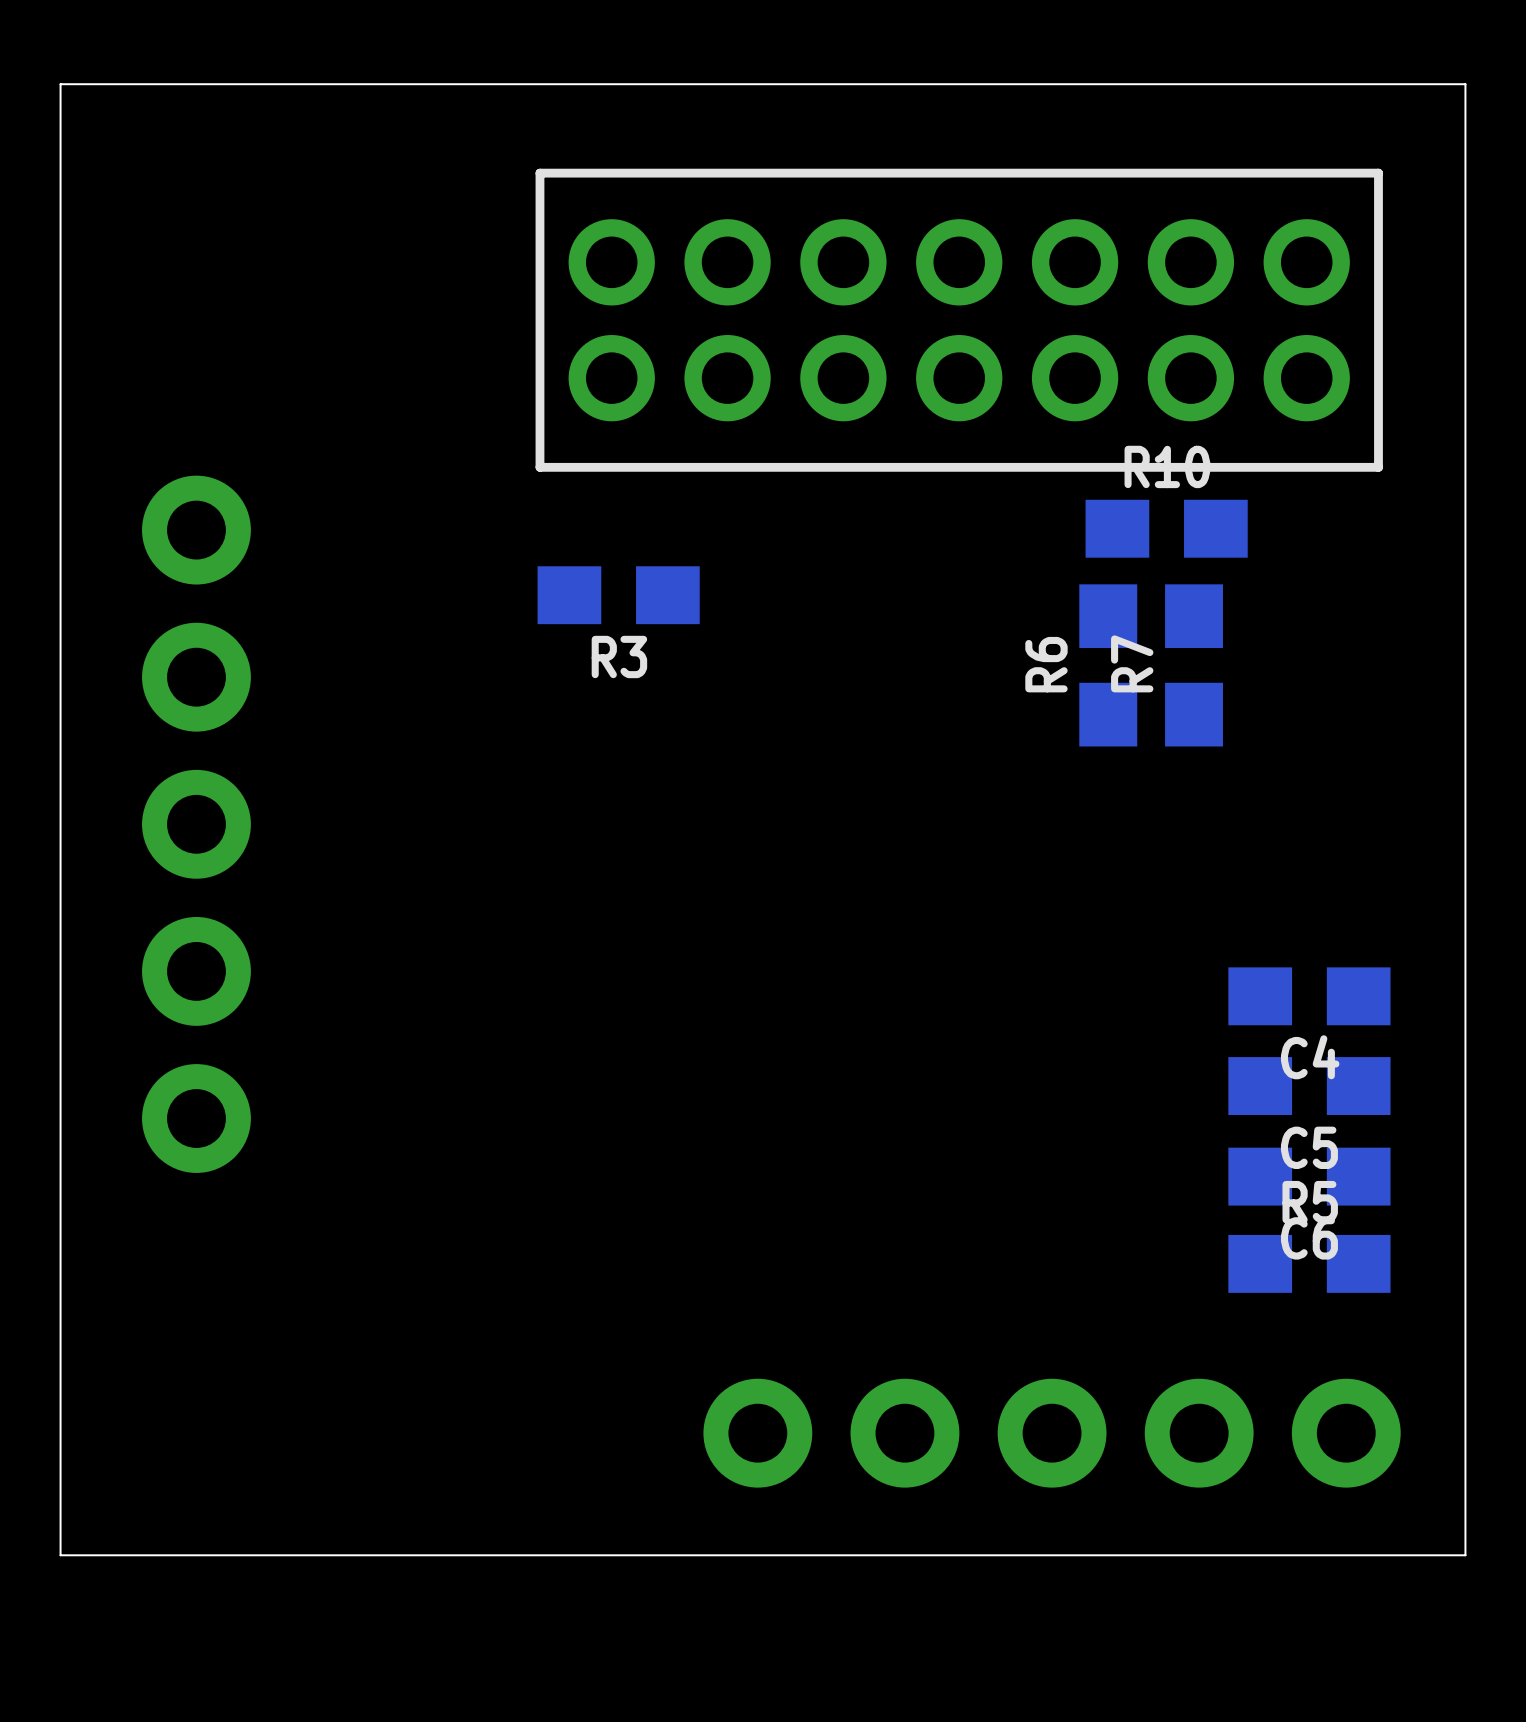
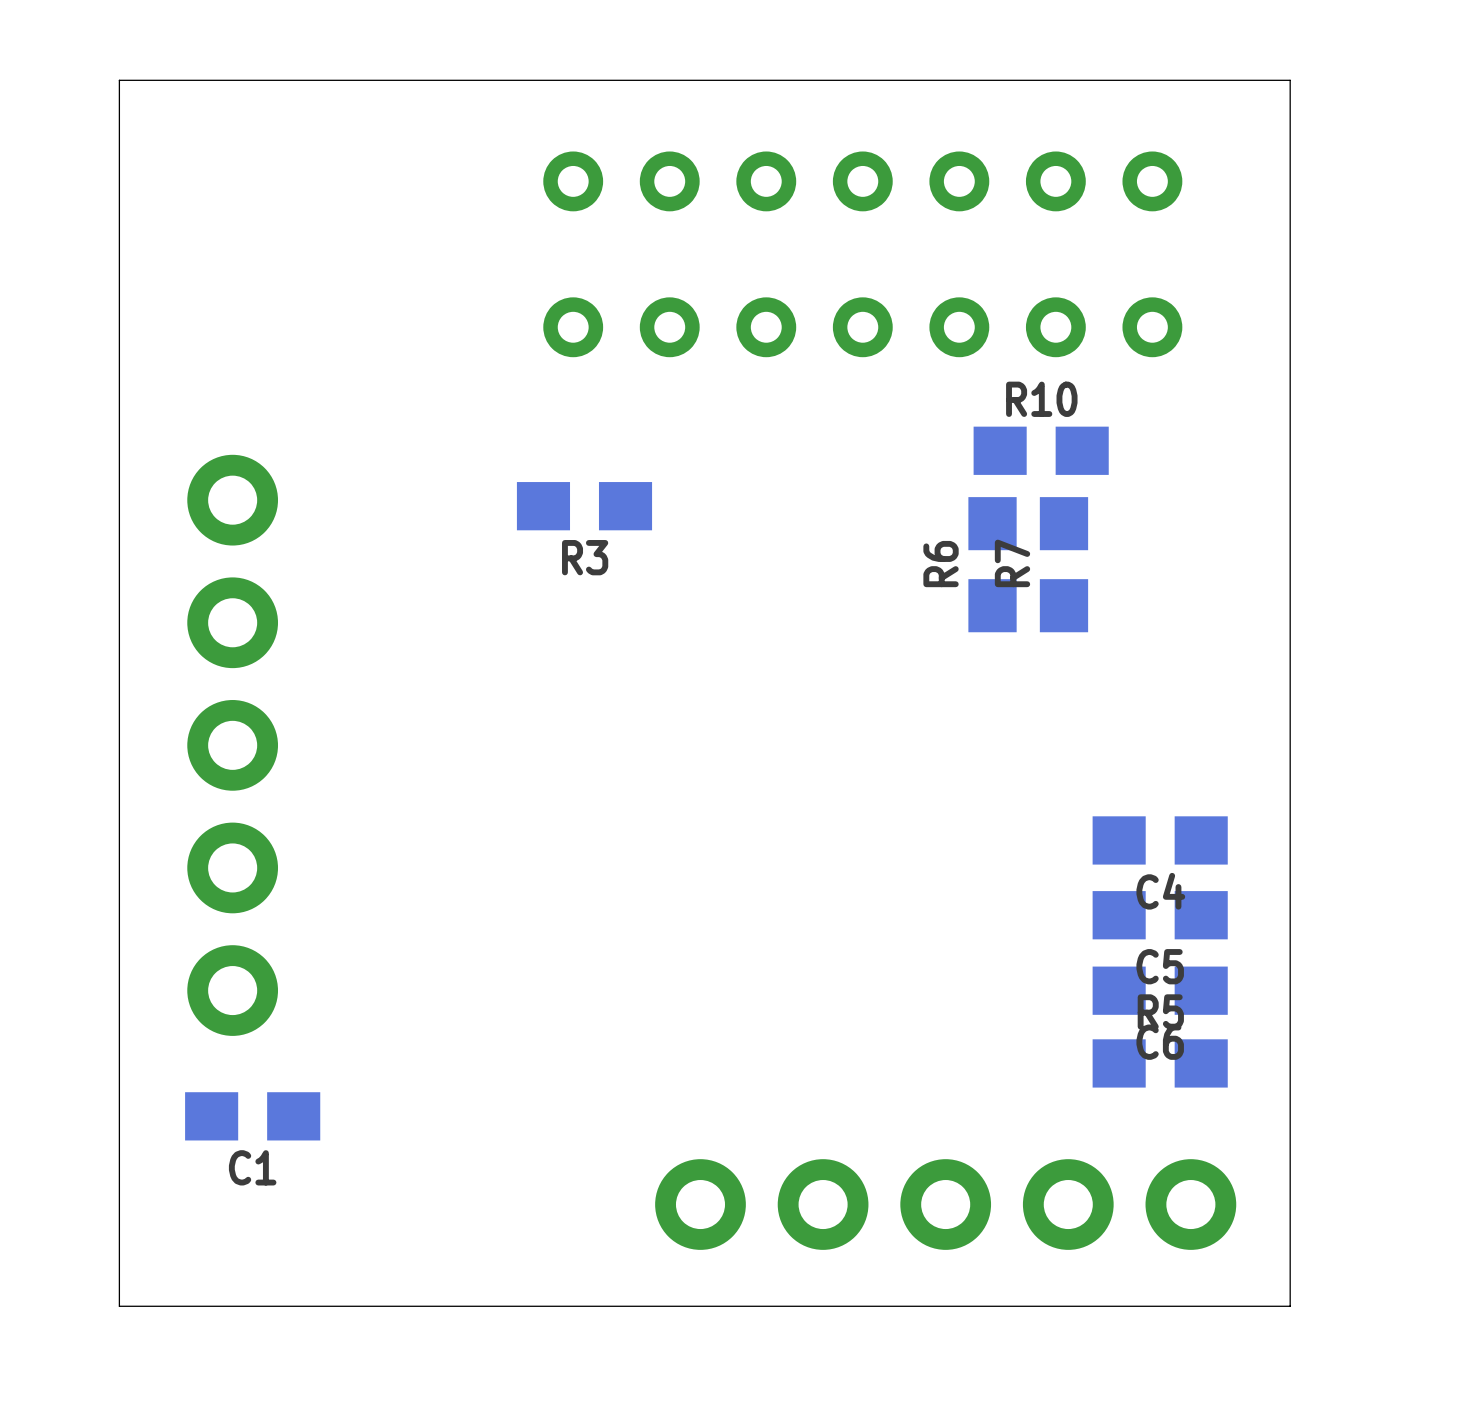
part footprint: [535, 168, 1383, 472] -> [543, 151, 1183, 358]
part position: (196, 824) -> (232, 745)
C1: none -> (252, 1116)

